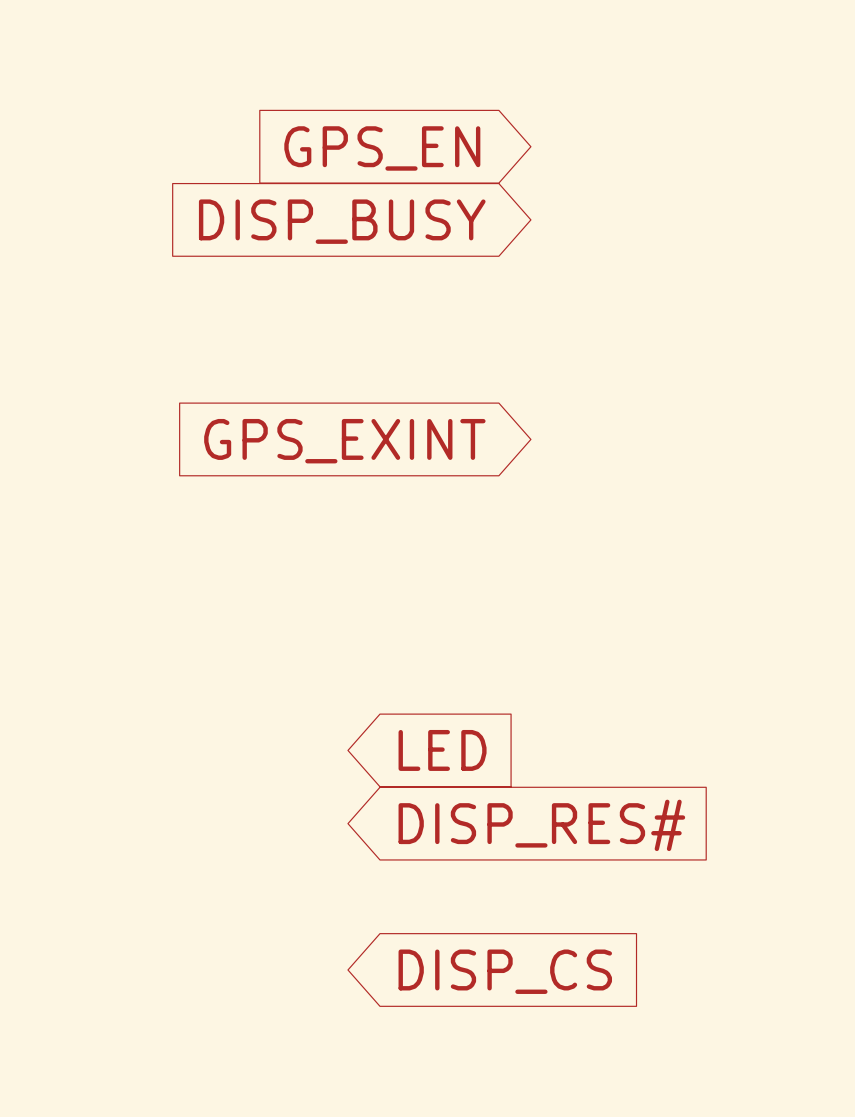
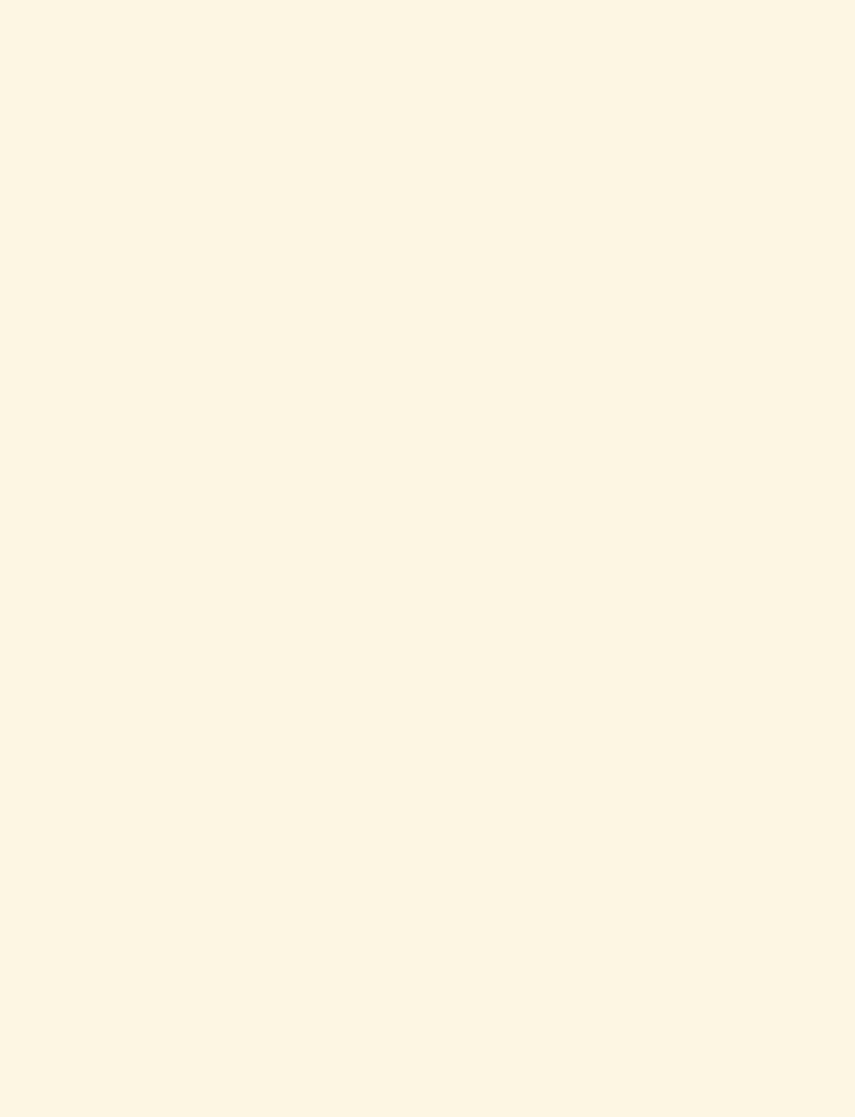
global label: GPS_EN (382, 148) -> none
global label: DISP_BUSY (342, 221) -> none
global label: GPS_EXINT (344, 441) -> none
global label: LED (442, 750) -> none
global label: DISP_RES# (541, 825) -> none
global label: DISP_CS (505, 971) -> none

